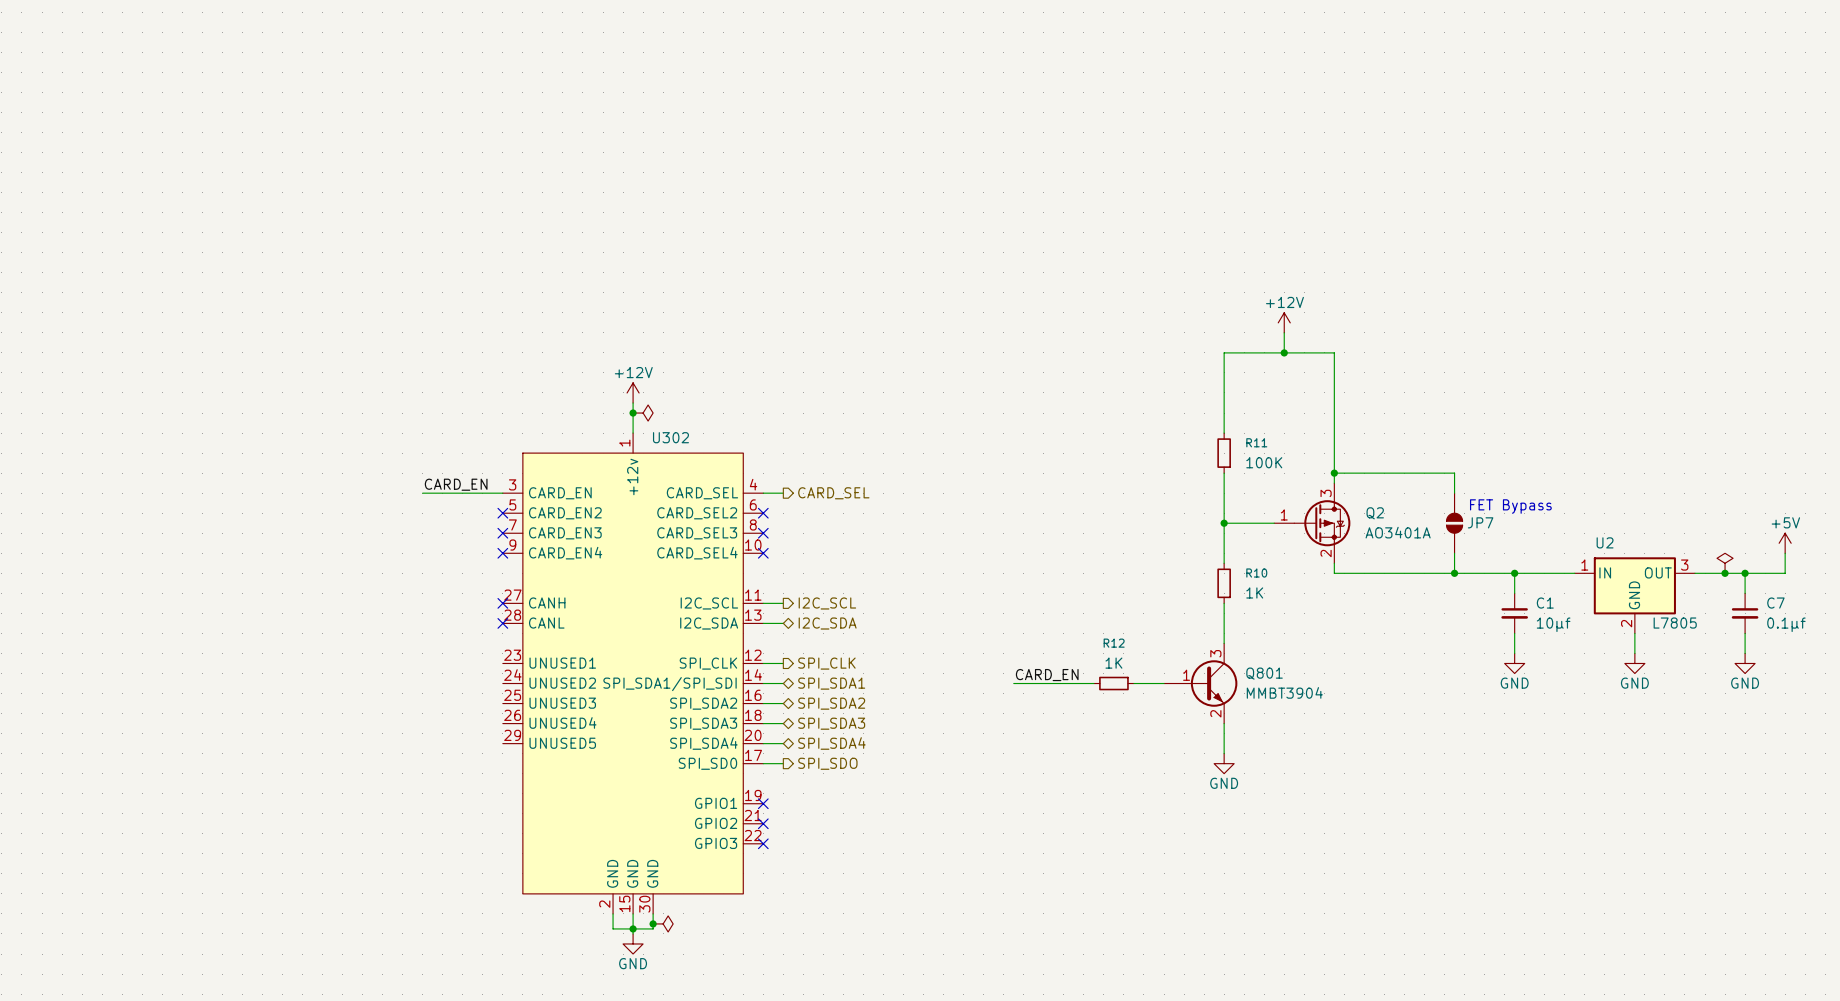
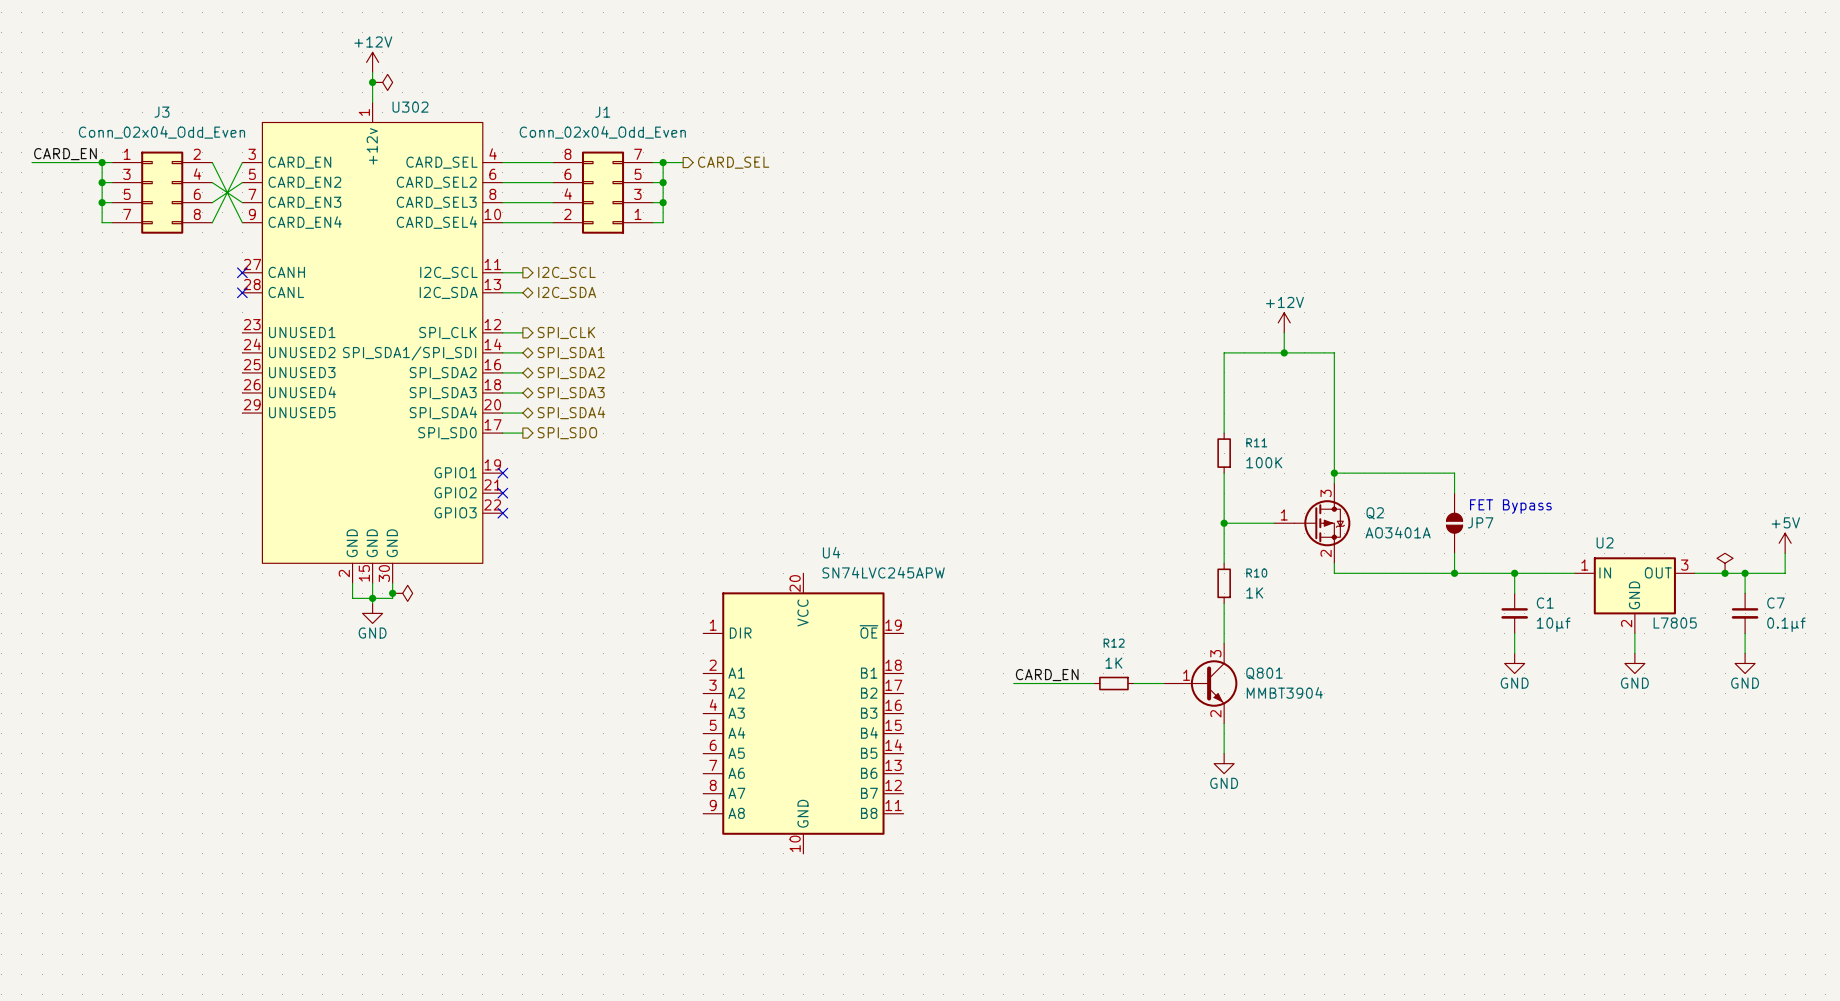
power symbol: none -> +12V (372, 62)
wire: none -> (372, 72) (372, 102)
junction: none -> (372, 82)
power symbol: none -> (382, 82)
label: none -> CARD_EN (65, 154)
wire: none -> (31, 162) (112, 162)
wire: none -> (102, 162) (102, 222) (112, 222)
junction: none -> (102, 162)
wire: none -> (212, 162) (242, 222)
wire: none -> (242, 162) (212, 222)
wire: none -> (502, 162) (552, 162)
wire: none -> (653, 162) (683, 162)
wire: none -> (663, 162) (663, 222) (653, 222)
junction: none -> (663, 162)
hierarchical label: none -> CARD_SEL (733, 162)
wire: none -> (102, 182) (112, 182)
junction: none -> (102, 182)
wire: none -> (212, 182) (242, 202)
wire: none -> (242, 182) (212, 202)
wire: none -> (502, 182) (552, 182)
wire: none -> (653, 182) (663, 182)
junction: none -> (663, 182)
J3: none -> Conn_02x04_Odd_Even (162, 192)
J1: none -> Conn_02x04_Odd_Even (603, 192)
wire: none -> (102, 202) (112, 202)
junction: none -> (102, 202)
wire: none -> (502, 202) (552, 202)
wire: none -> (653, 202) (663, 202)
junction: none -> (663, 202)
wire: none -> (502, 222) (552, 222)
no-connect mark: none -> (242, 272)
wire: none -> (502, 272) (522, 272)
hierarchical label: none -> I2C_SCL (566, 272)
no-connect mark: none -> (242, 292)
wire: none -> (502, 292) (522, 292)
hierarchical label: none -> I2C_SDA (567, 292)
wire: none -> (502, 332) (522, 332)
hierarchical label: none -> SPI_CLK (566, 332)
wire: none -> (502, 352) (522, 352)
hierarchical label: none -> SPI_SDA1 (571, 353)
wire: none -> (502, 372) (522, 372)
hierarchical label: none -> SPI_SDA2 (571, 373)
wire: none -> (502, 392) (522, 392)
power symbol: +12V (633, 392) -> none
hierarchical label: none -> SPI_SDA3 (571, 393)
wire: (633, 403) (633, 433) -> none
hierarchical label: none -> SPI_SDA4 (571, 412)
wire: none -> (502, 413) (522, 413)
junction: (633, 413) -> none
power symbol: (643, 413) -> none
wire: none -> (502, 433) (522, 433)
hierarchical label: none -> SPI_SDO (567, 433)
no-connect mark: none -> (502, 473)
label: CARD_EN (456, 484) -> none
no-connect mark: none -> (502, 493)
wire: (763, 493) (783, 493) -> none
hierarchical label: CARD_SEL (833, 493) -> none
no-connect mark: (763, 513) -> none
no-connect mark: (502, 533) -> none
no-connect mark: (763, 533) -> none
no-connect mark: (502, 553) -> none
no-connect mark: (763, 553) -> none
wire: none -> (352, 583) (352, 598) (392, 598) (392, 583)
wire: none -> (372, 583) (372, 603)
junction: none -> (392, 593)
power symbol: none -> (402, 593)
junction: none -> (372, 598)
no-connect mark: (502, 603) -> none
hierarchical label: I2C_SCL (827, 603) -> none
power symbol: none -> GND (372, 613)
no-connect mark: (502, 623) -> none
hierarchical label: I2C_SDA (827, 623) -> none
hierarchical label: SPI_CLK (826, 663) -> none
U302 position: (633, 673) -> (372, 342)
hierarchical label: SPI_SDA1 (831, 683) -> none
hierarchical label: SPI_SDA2 (831, 703) -> none
U4: none -> SN74LVC245APW (803, 713)
hierarchical label: SPI_SDA3 (831, 723) -> none
hierarchical label: SPI_SDA4 (831, 743) -> none
hierarchical label: SPI_SDO (827, 763) -> none
no-connect mark: (763, 803) -> none
no-connect mark: (763, 823) -> none
no-connect mark: (763, 843) -> none
wire: (613, 913) (613, 928) (653, 928) (653, 913) -> none
wire: (633, 913) (633, 933) -> none
junction: (653, 923) -> none
power symbol: (663, 923) -> none
junction: (633, 928) -> none
power symbol: GND (633, 943) -> none

